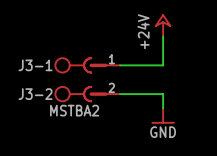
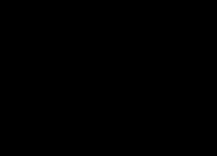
power symbol: +24V (163, 25) -> none
wire: (163, 36) (163, 65) (120, 65) -> none
J3-1: (87, 65) -> none
J3-2: MSTBA2 (87, 94) -> none
wire: (120, 94) (163, 94) (163, 108) -> none
power symbol: GND (163, 116) -> none

